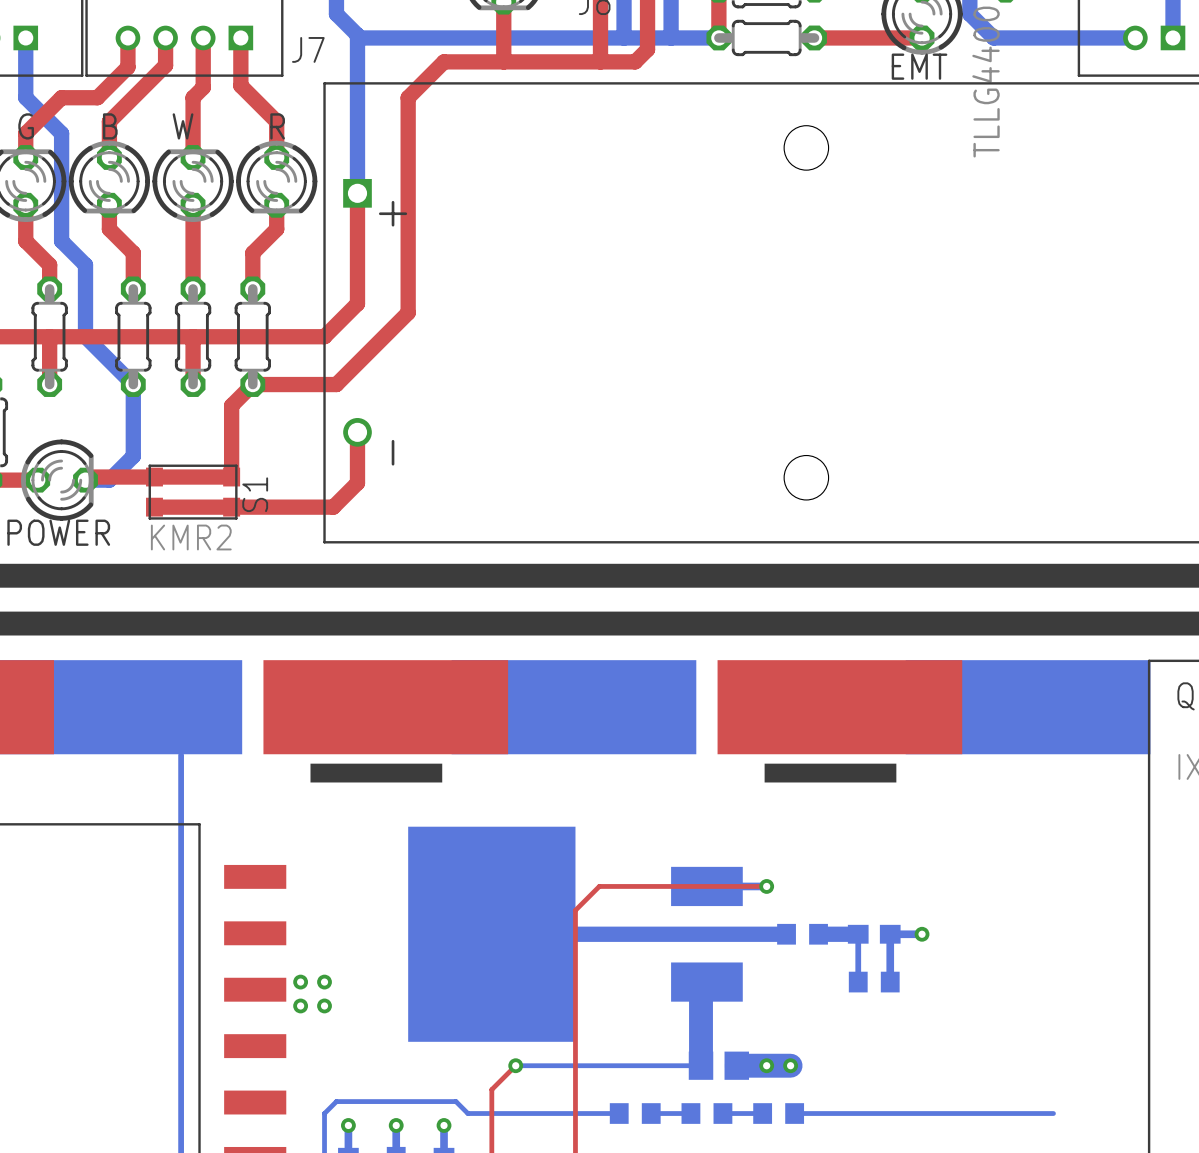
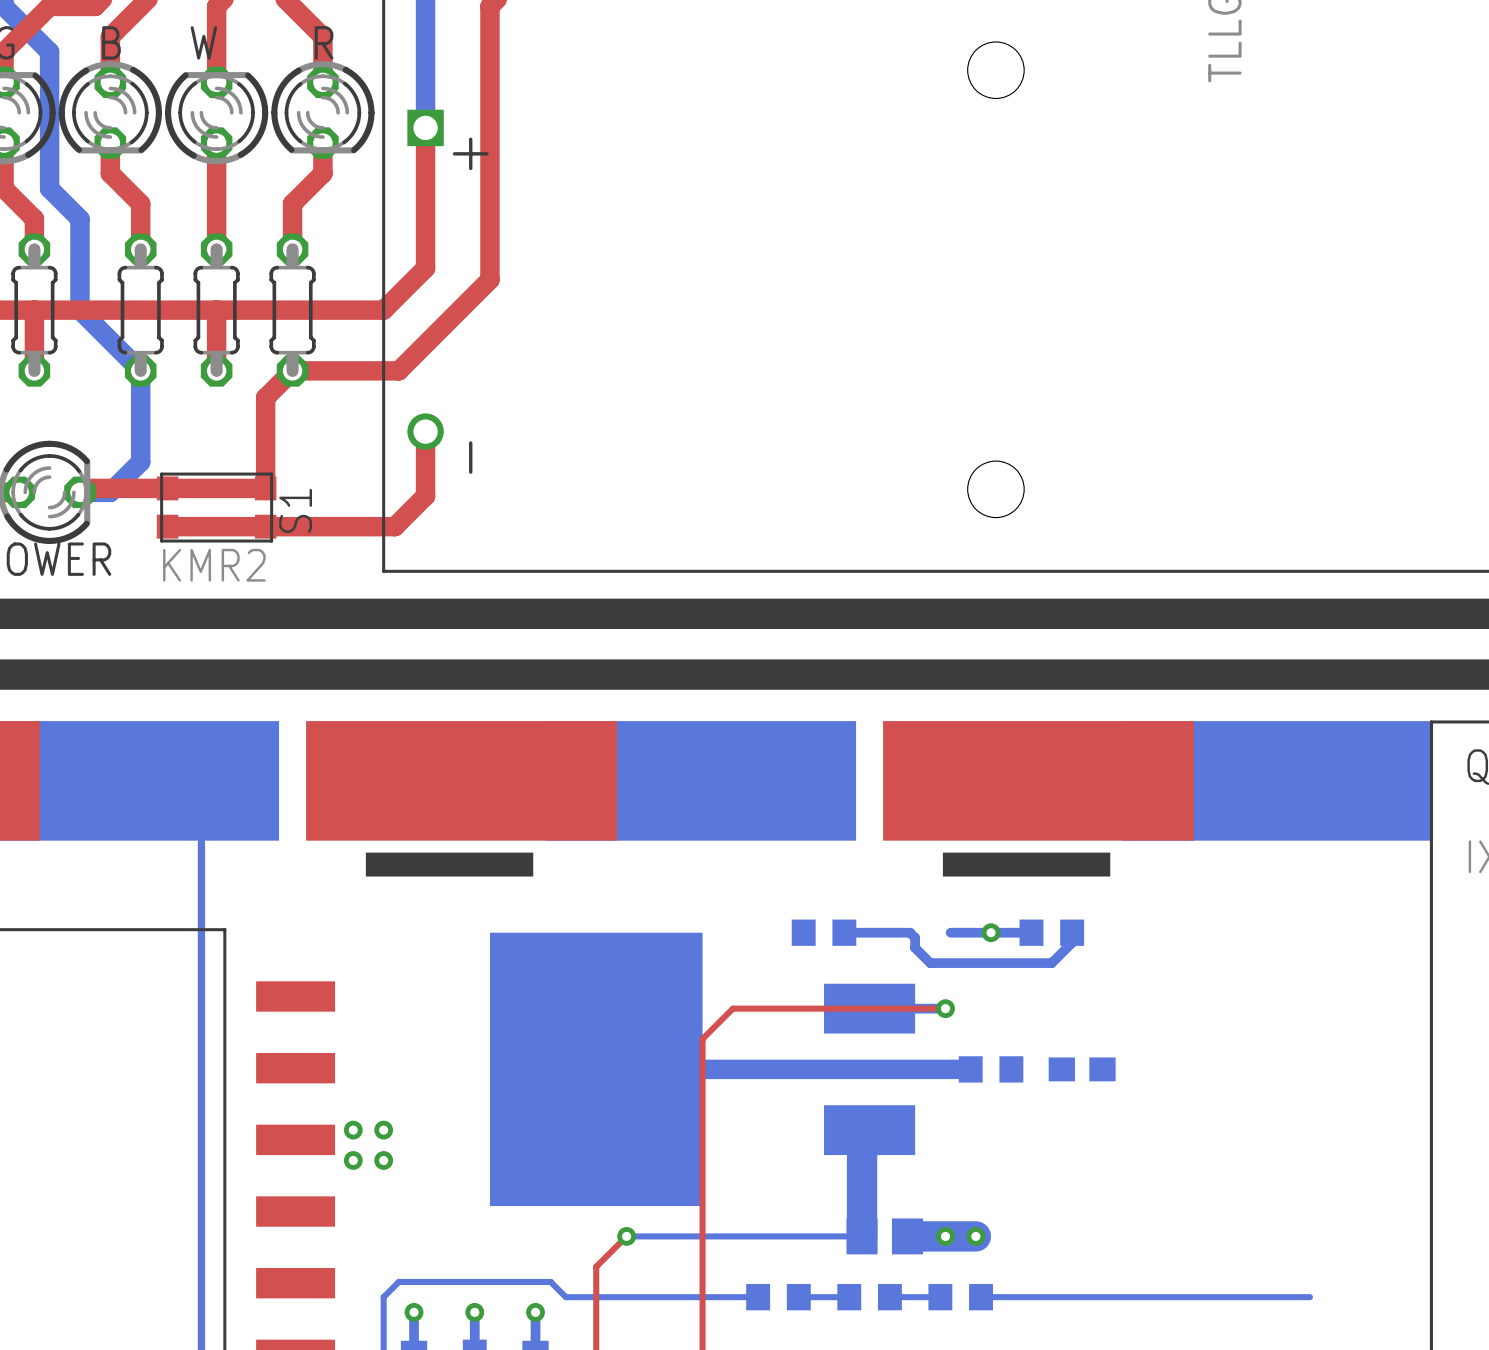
part: none -> (824, 932)
bottom track: none -> (844, 932) (910, 932) (915, 937) (915, 947) (930, 963) (1051, 963) (1072, 942) (1072, 932)
bottom track: none -> (950, 932) (1031, 932)
via: none -> (991, 932)
part: none -> (1051, 932)
bottom track: (818, 934) (858, 934) (858, 982) -> none
bottom track: (922, 934) (890, 934) (890, 982) -> none
via: (922, 934) -> none
part: (874, 982) -> none

